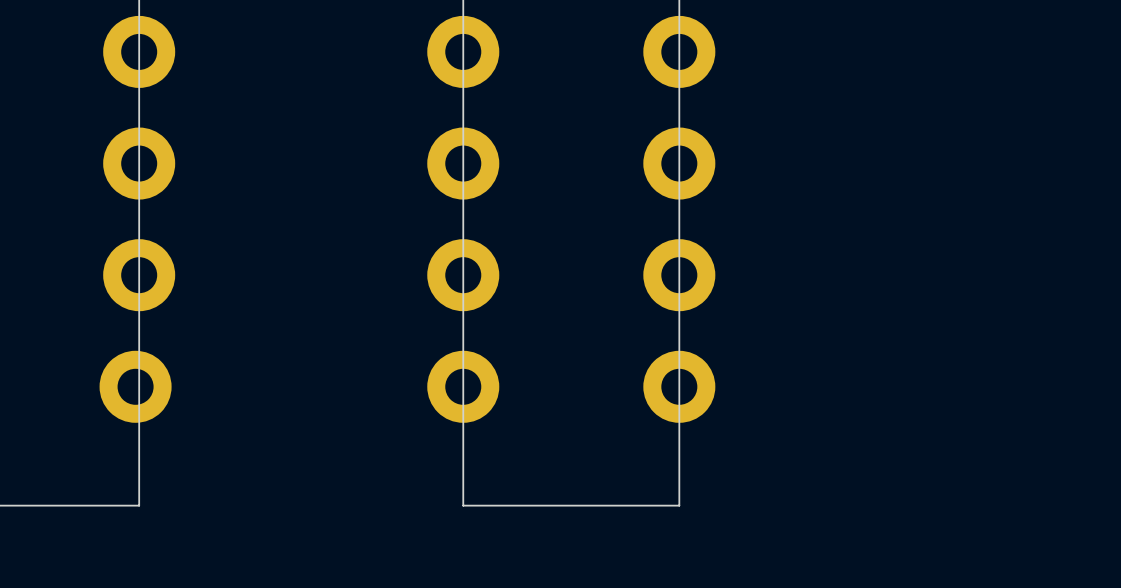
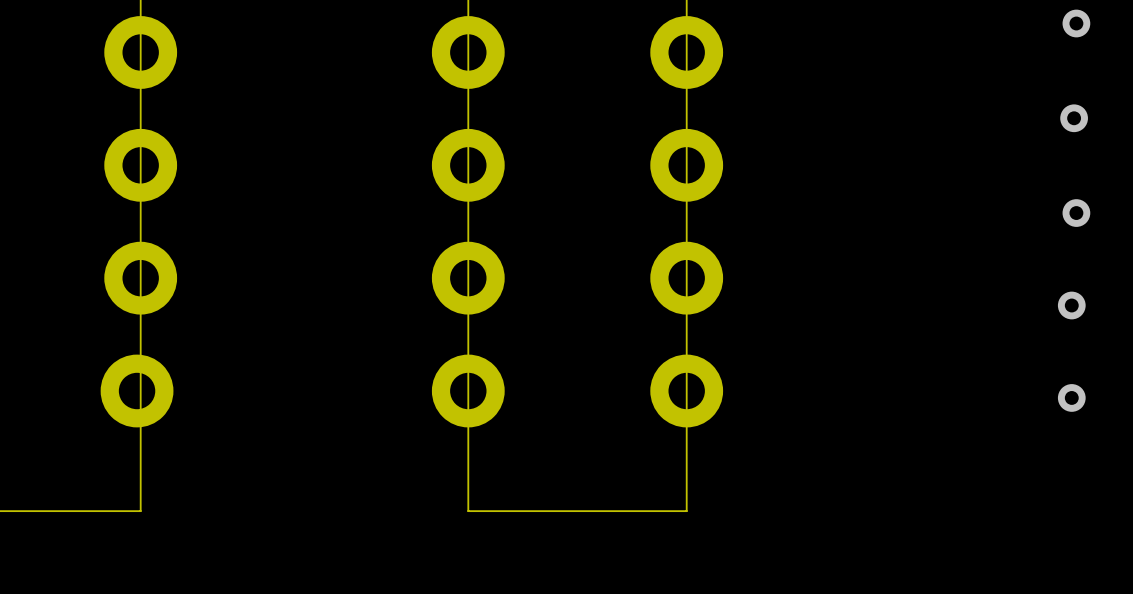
via: none -> (1076, 23)
via: none -> (1074, 118)
via: none -> (1076, 213)
via: none -> (1071, 305)
via: none -> (1071, 397)

